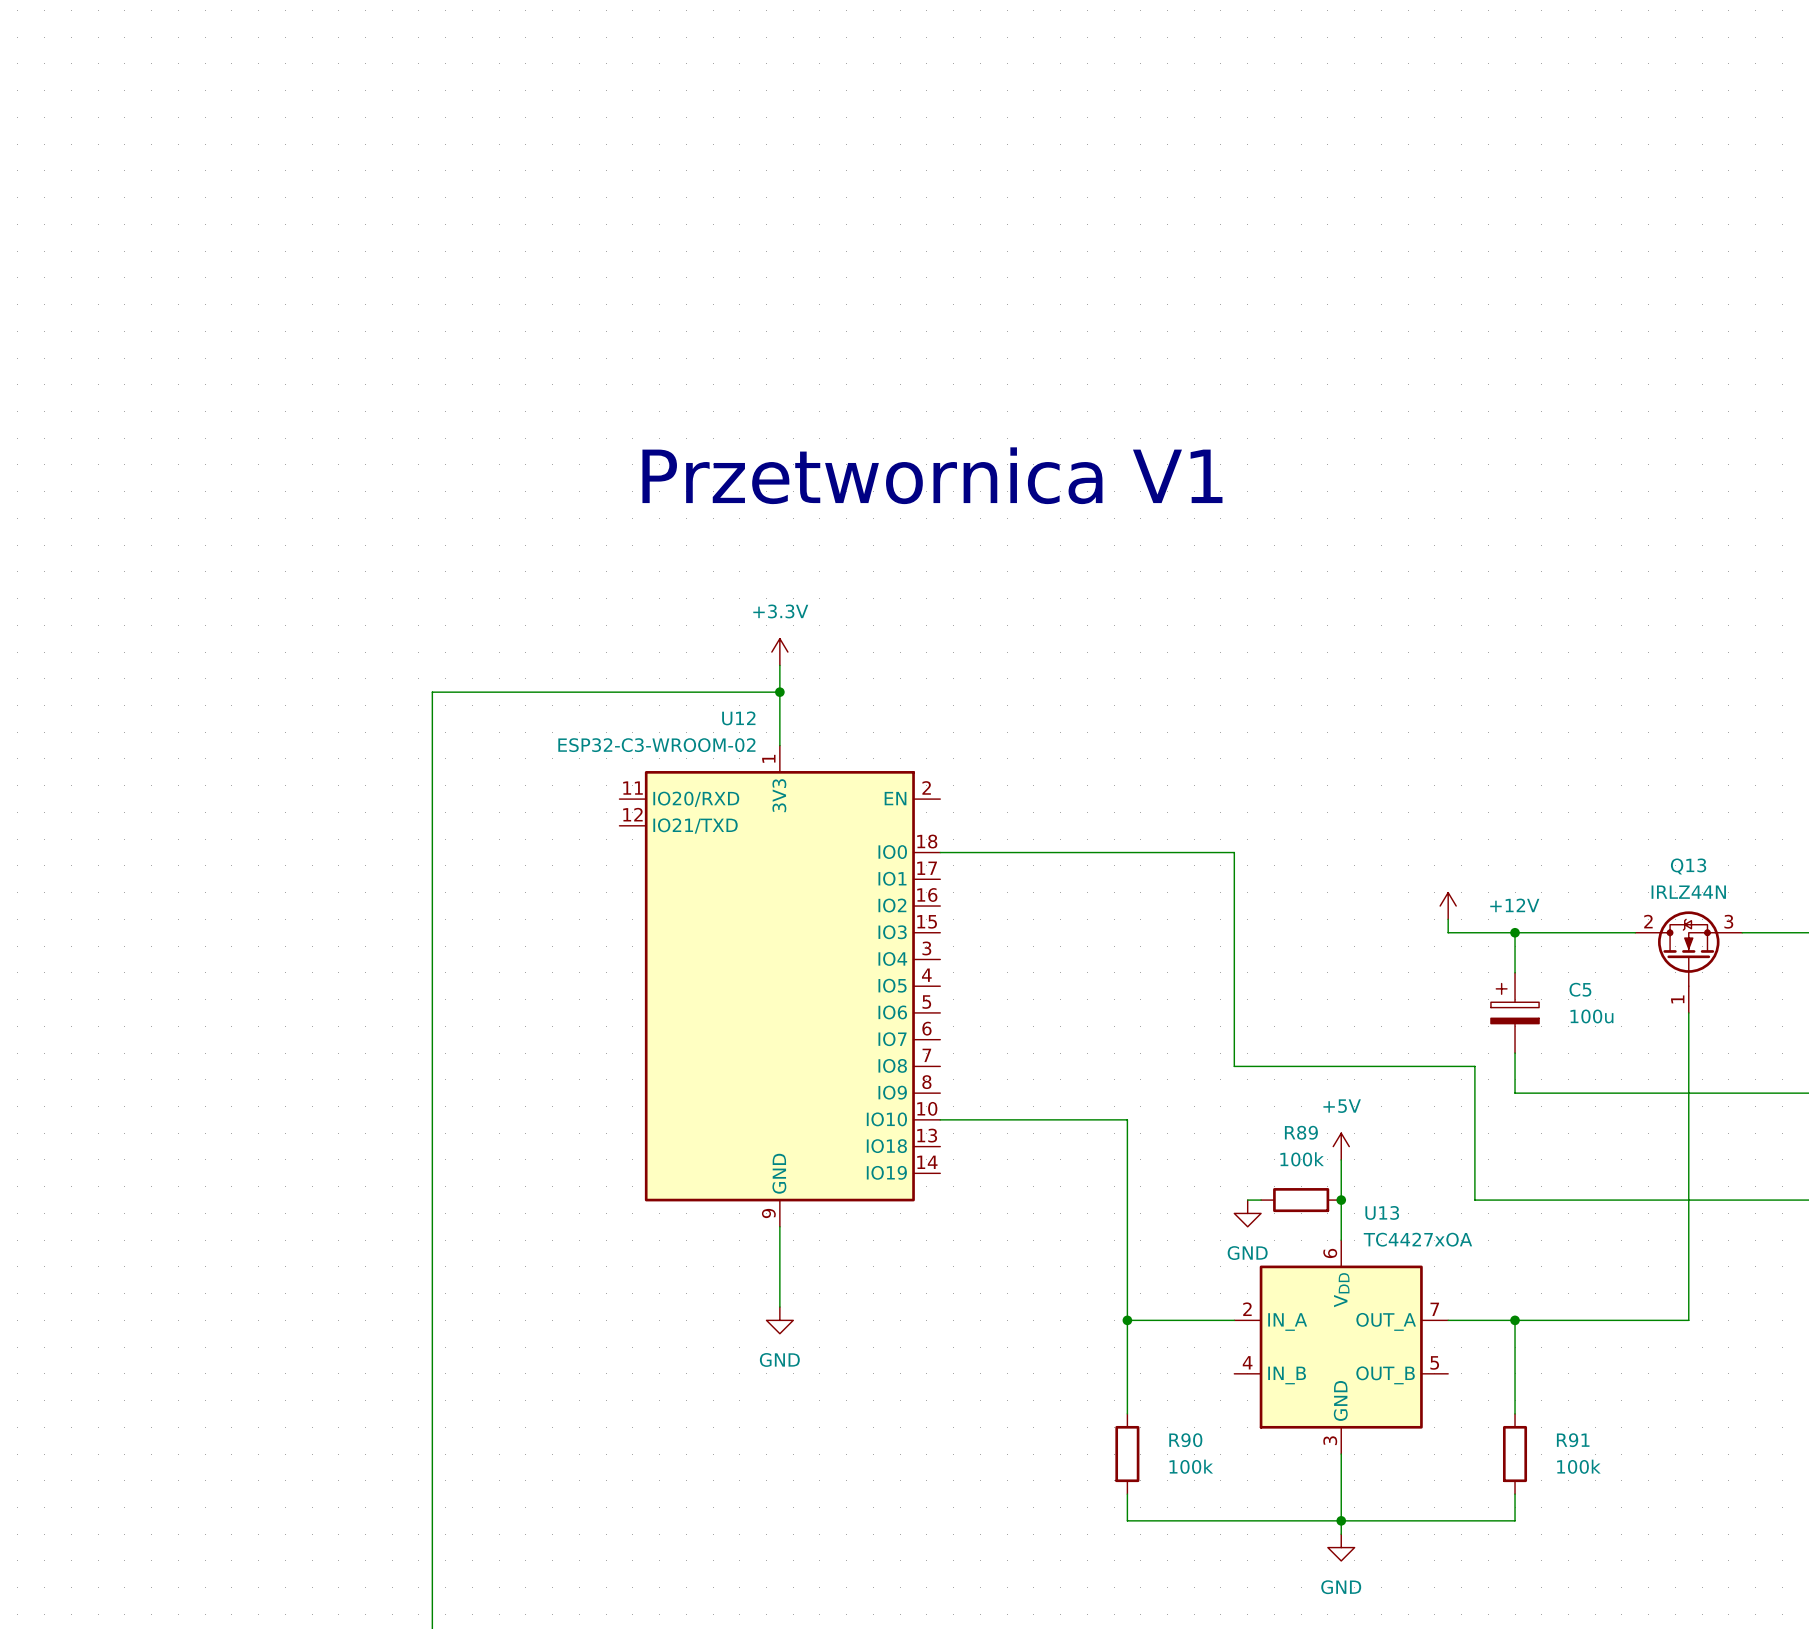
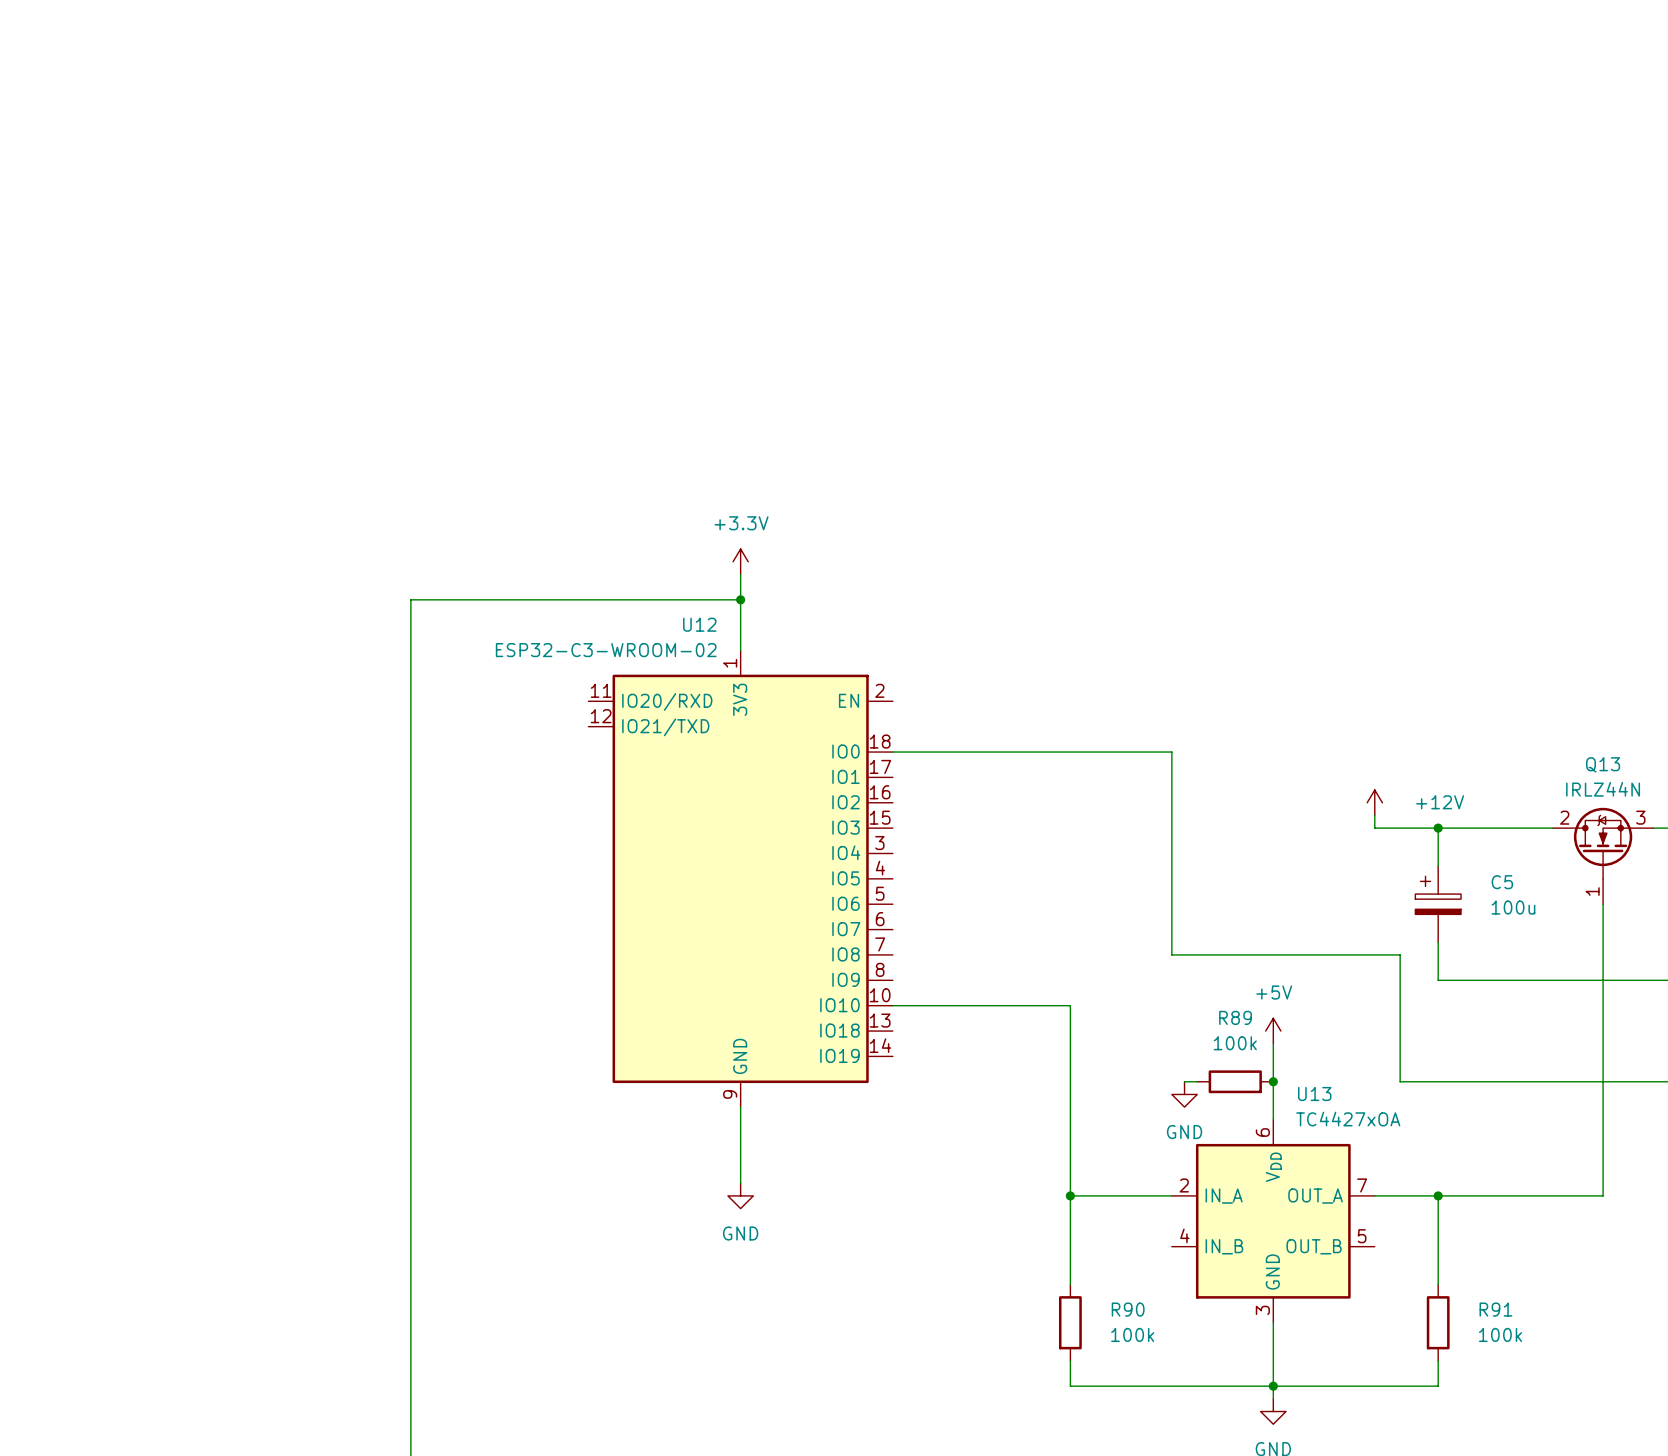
text: Przetwornica V1 (932, 475) -> none

